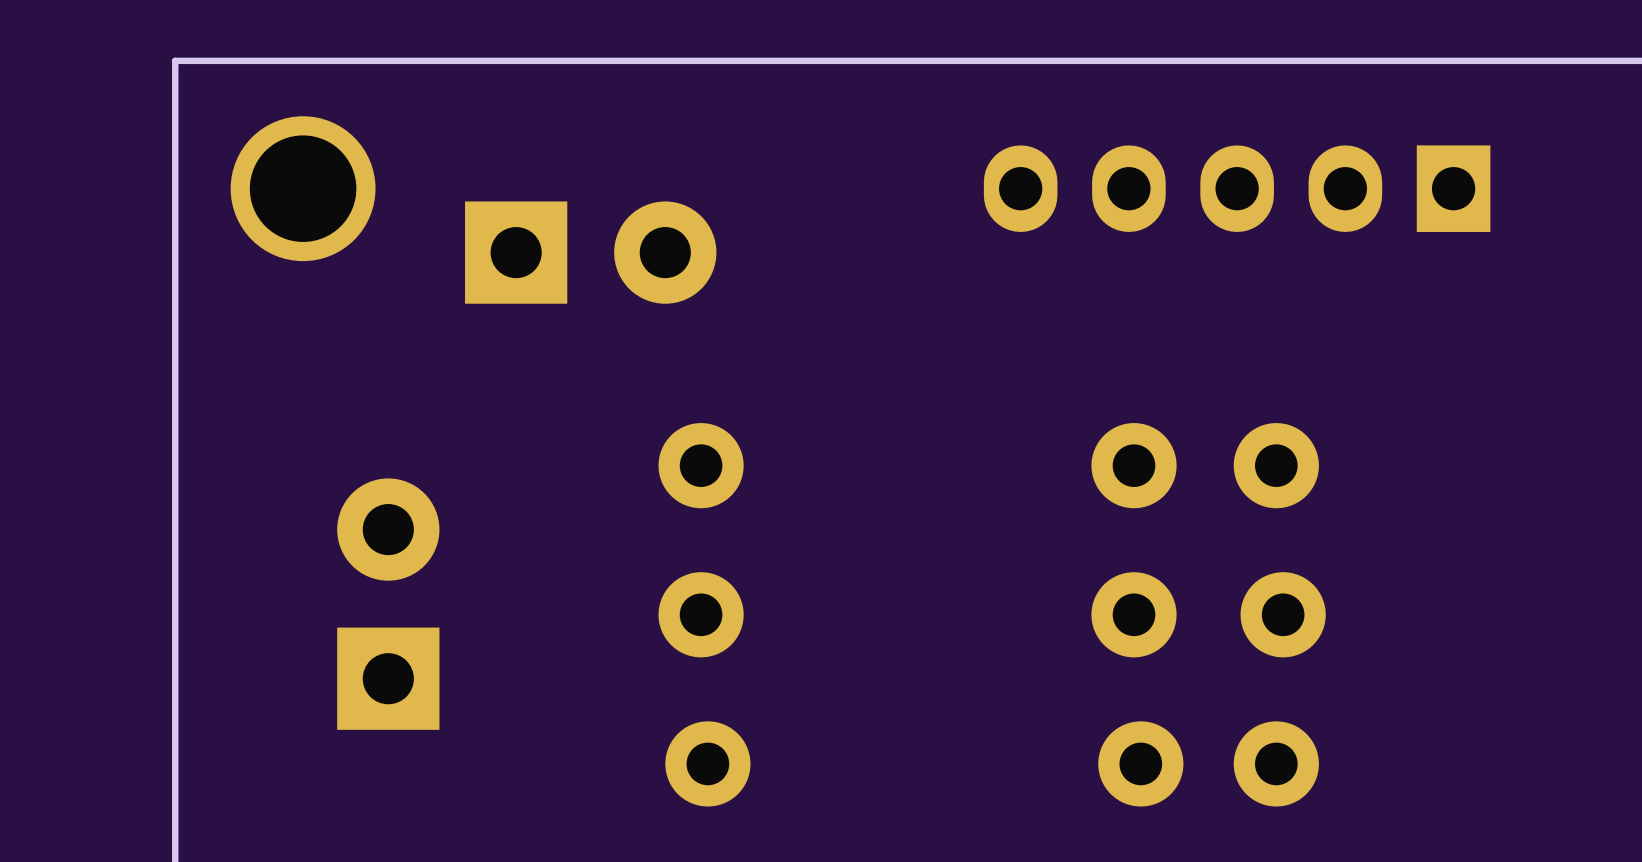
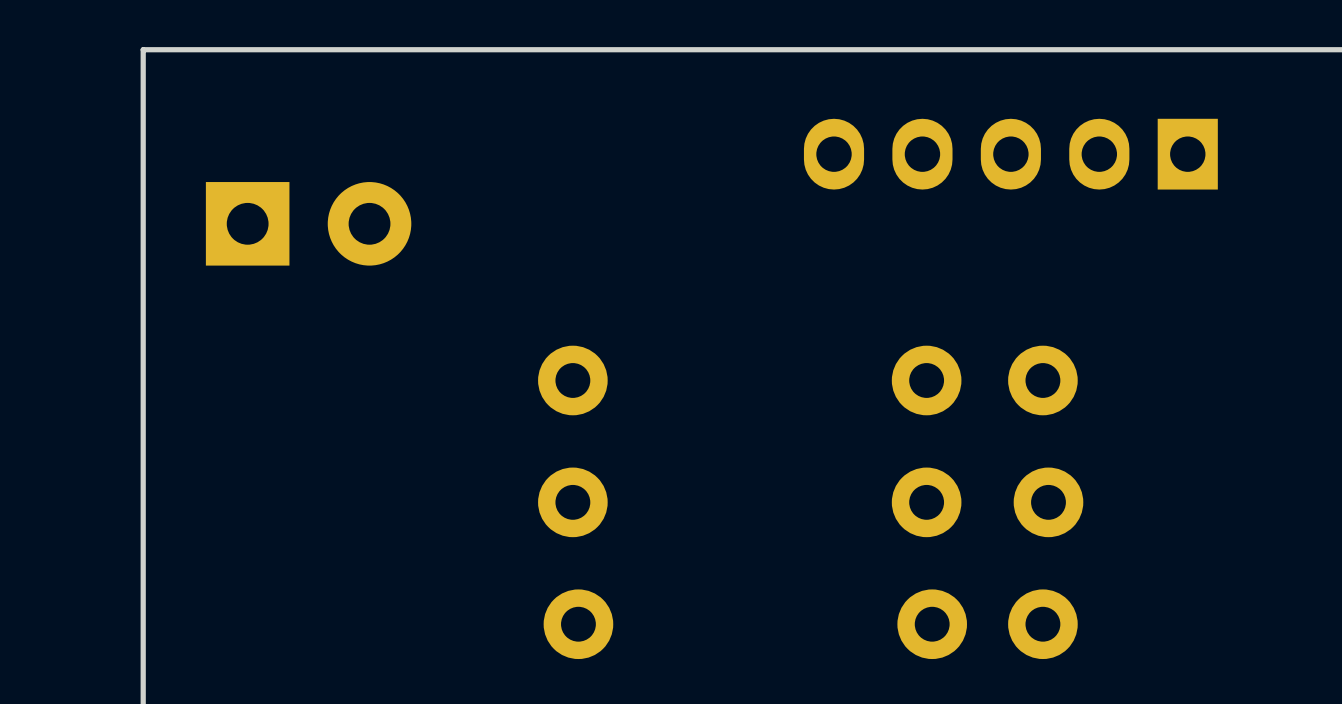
part: (303, 188) -> none
part: (590, 252) -> none
part: none -> (308, 223)
part: (388, 604) -> none

